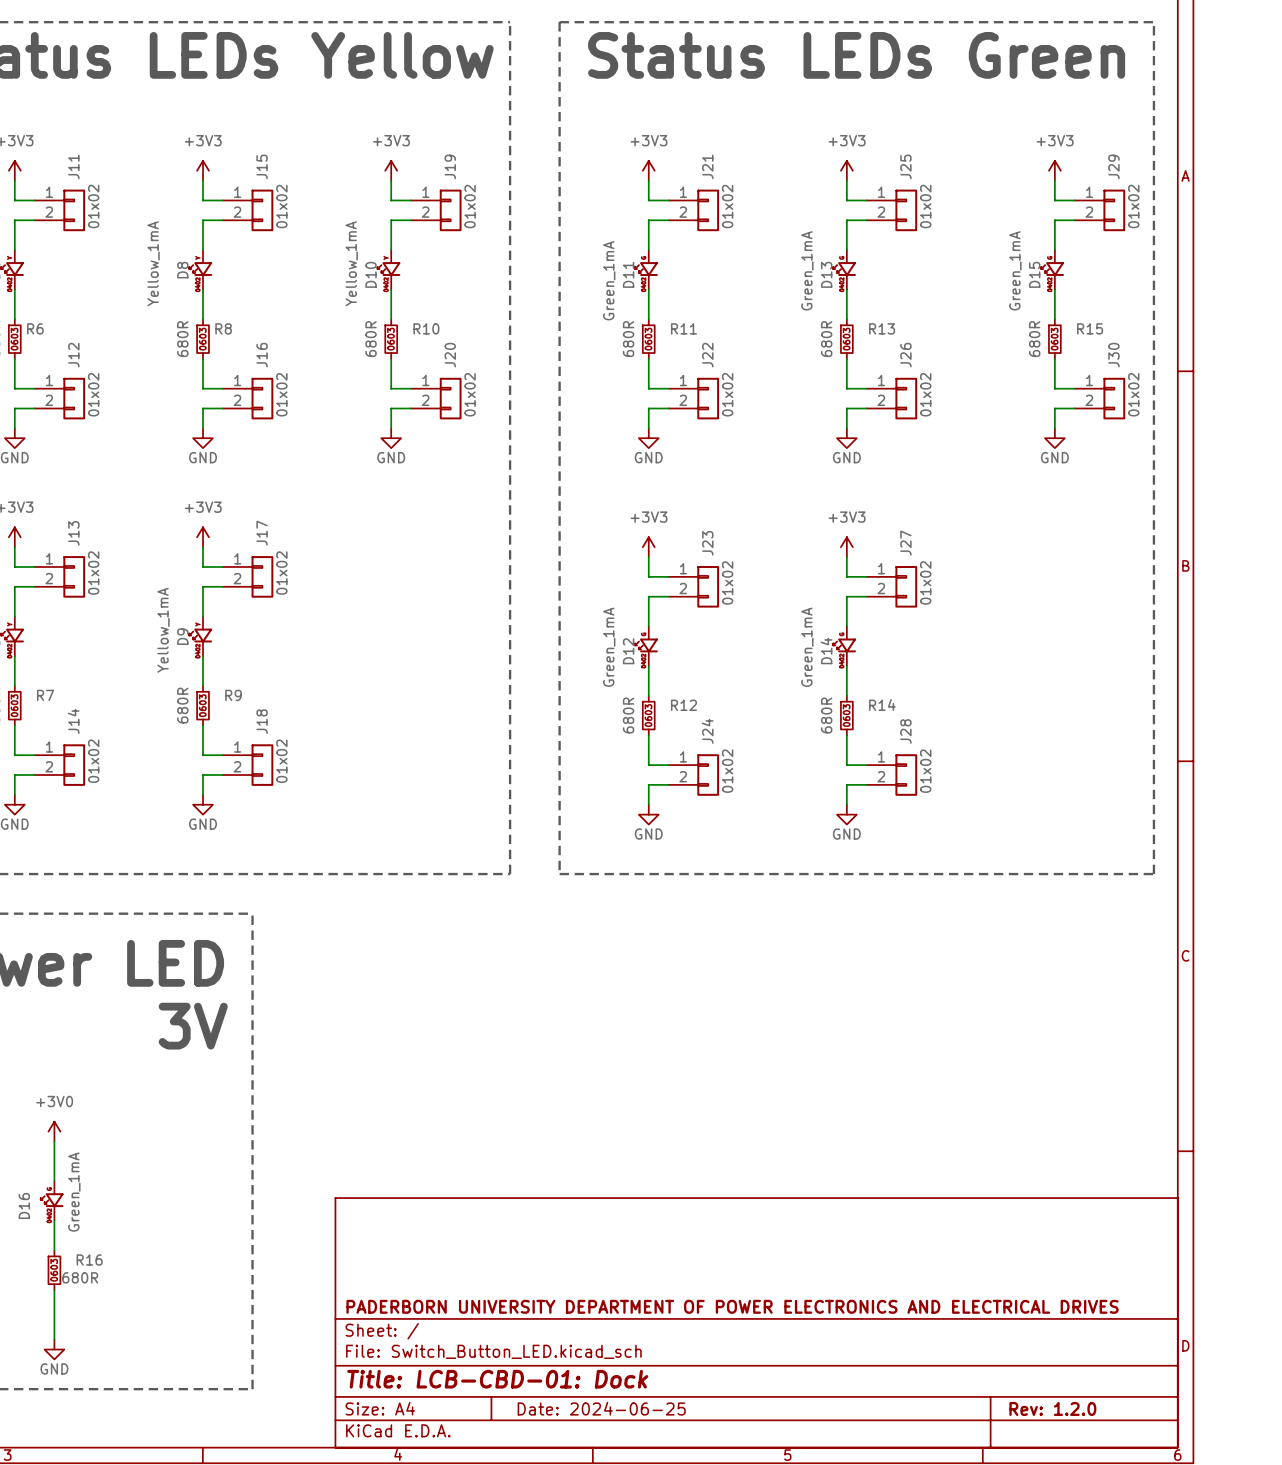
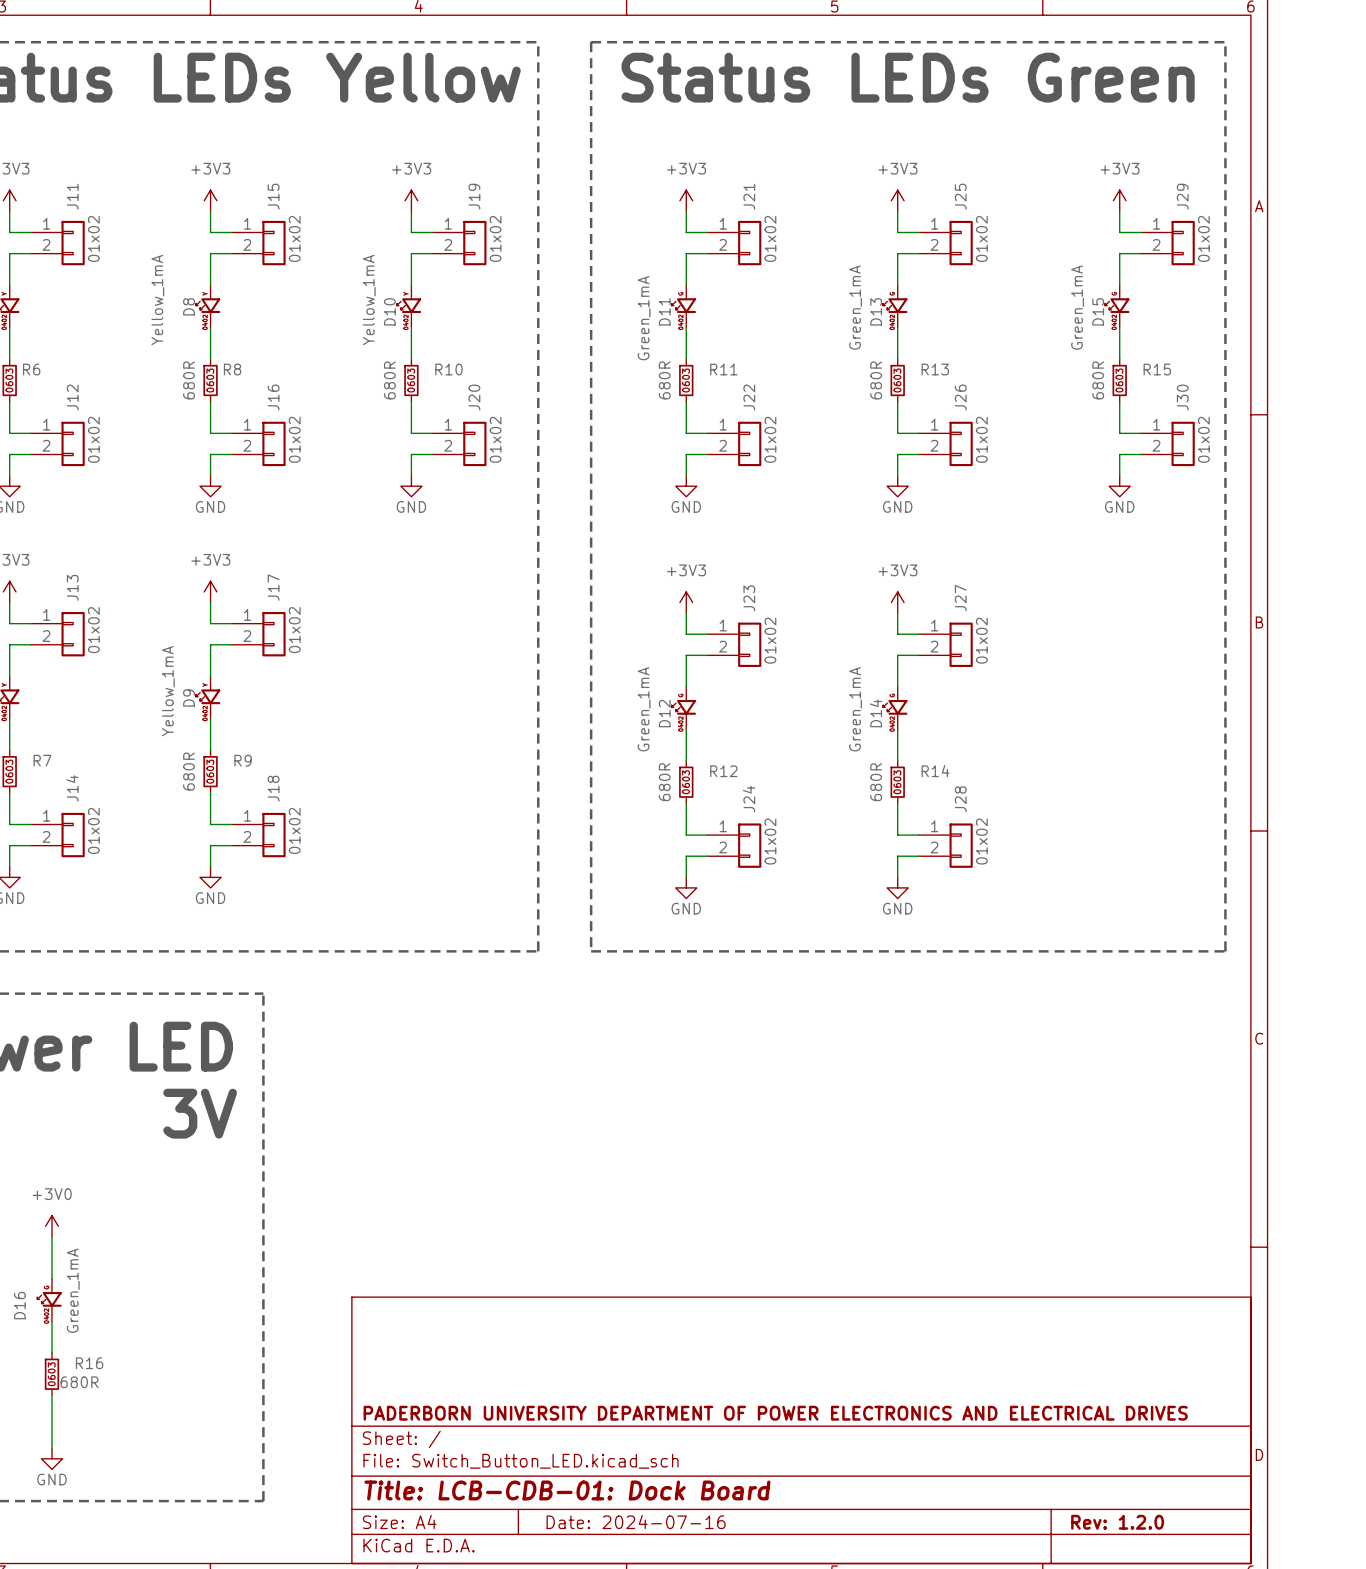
title block: Title: LCB-CBD-01: Dock (497, 1379) -> Title: LCB-CDB-01: Dock Board (567, 1490)
title block: Date: 2024-06-25 (601, 1408) -> Date: 2024-07-16 (636, 1521)

